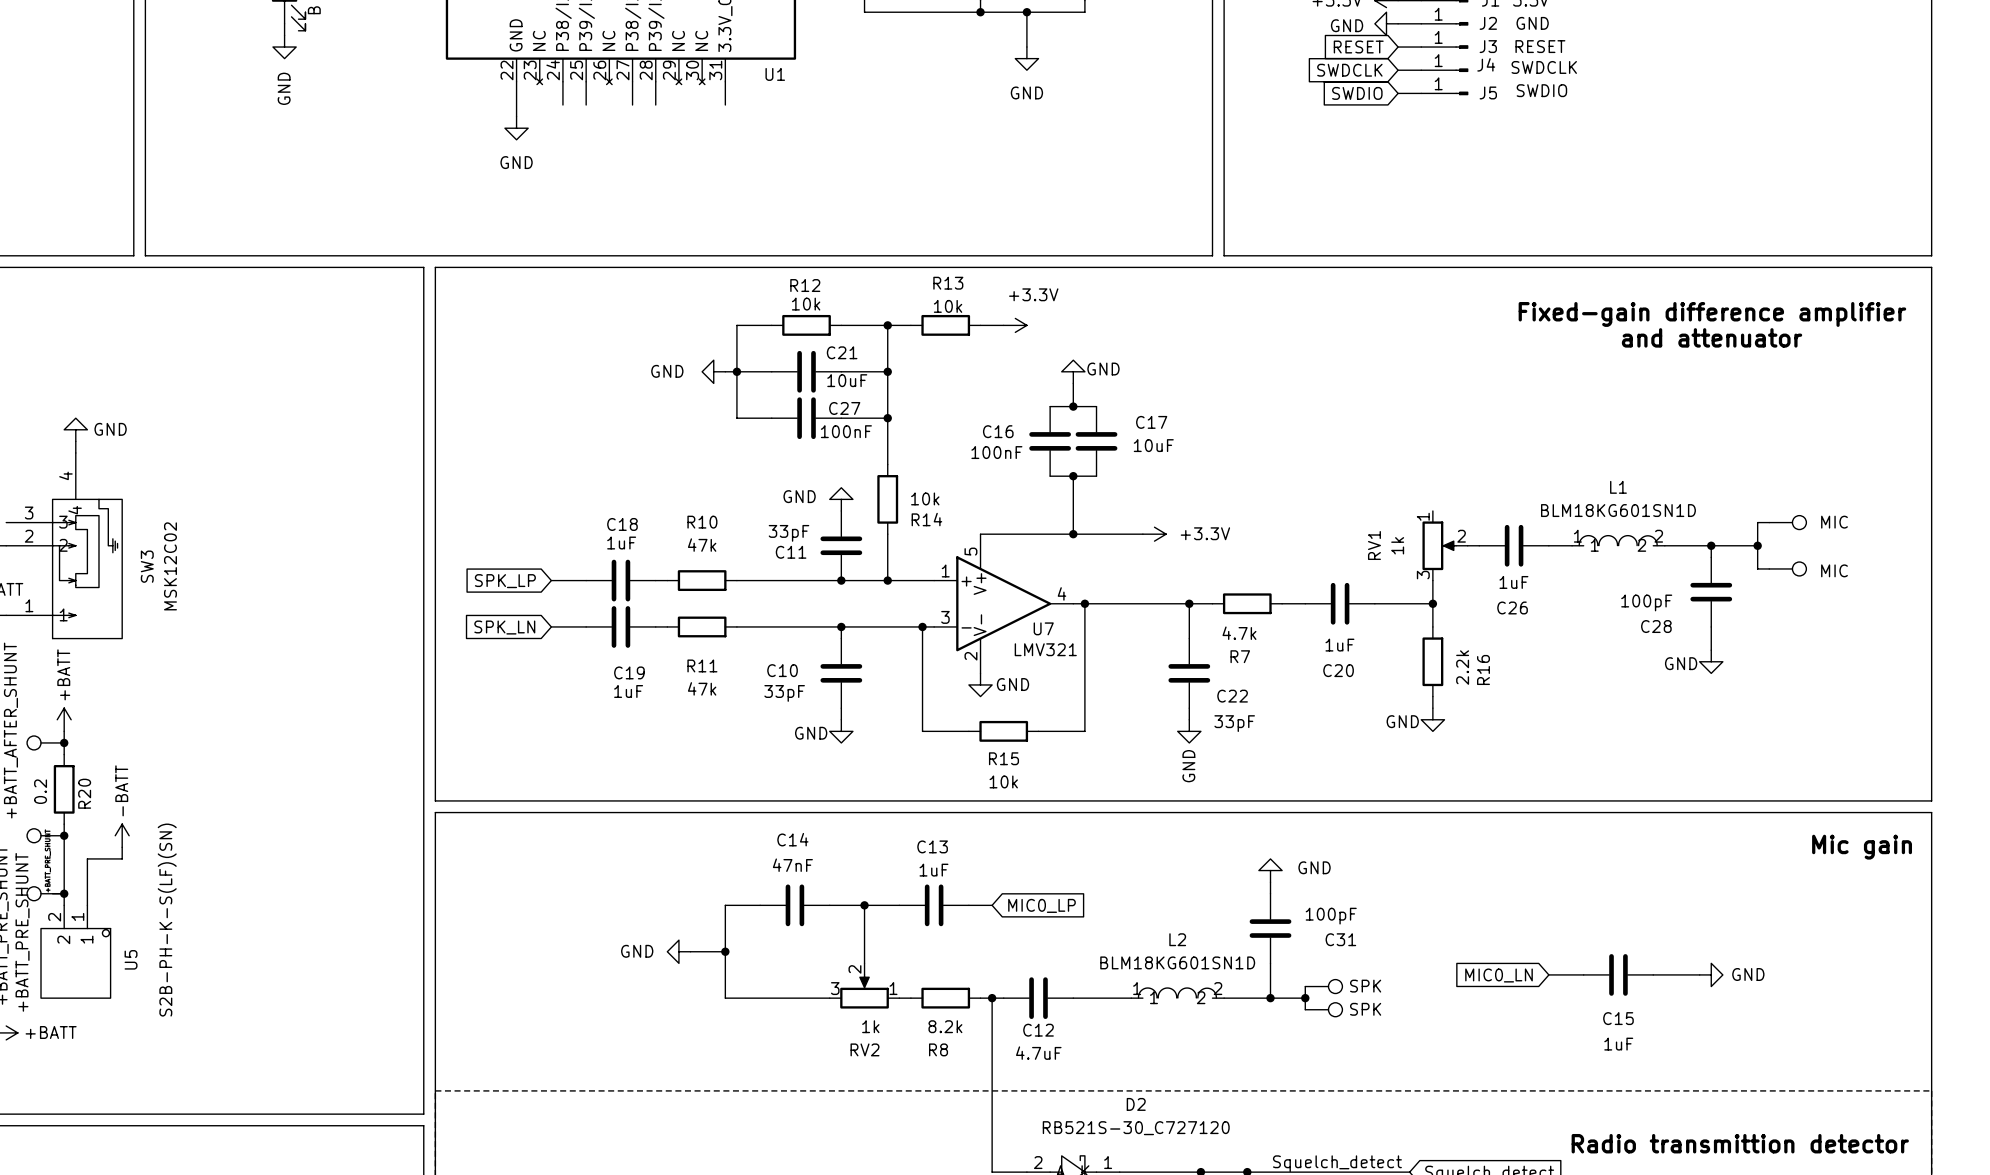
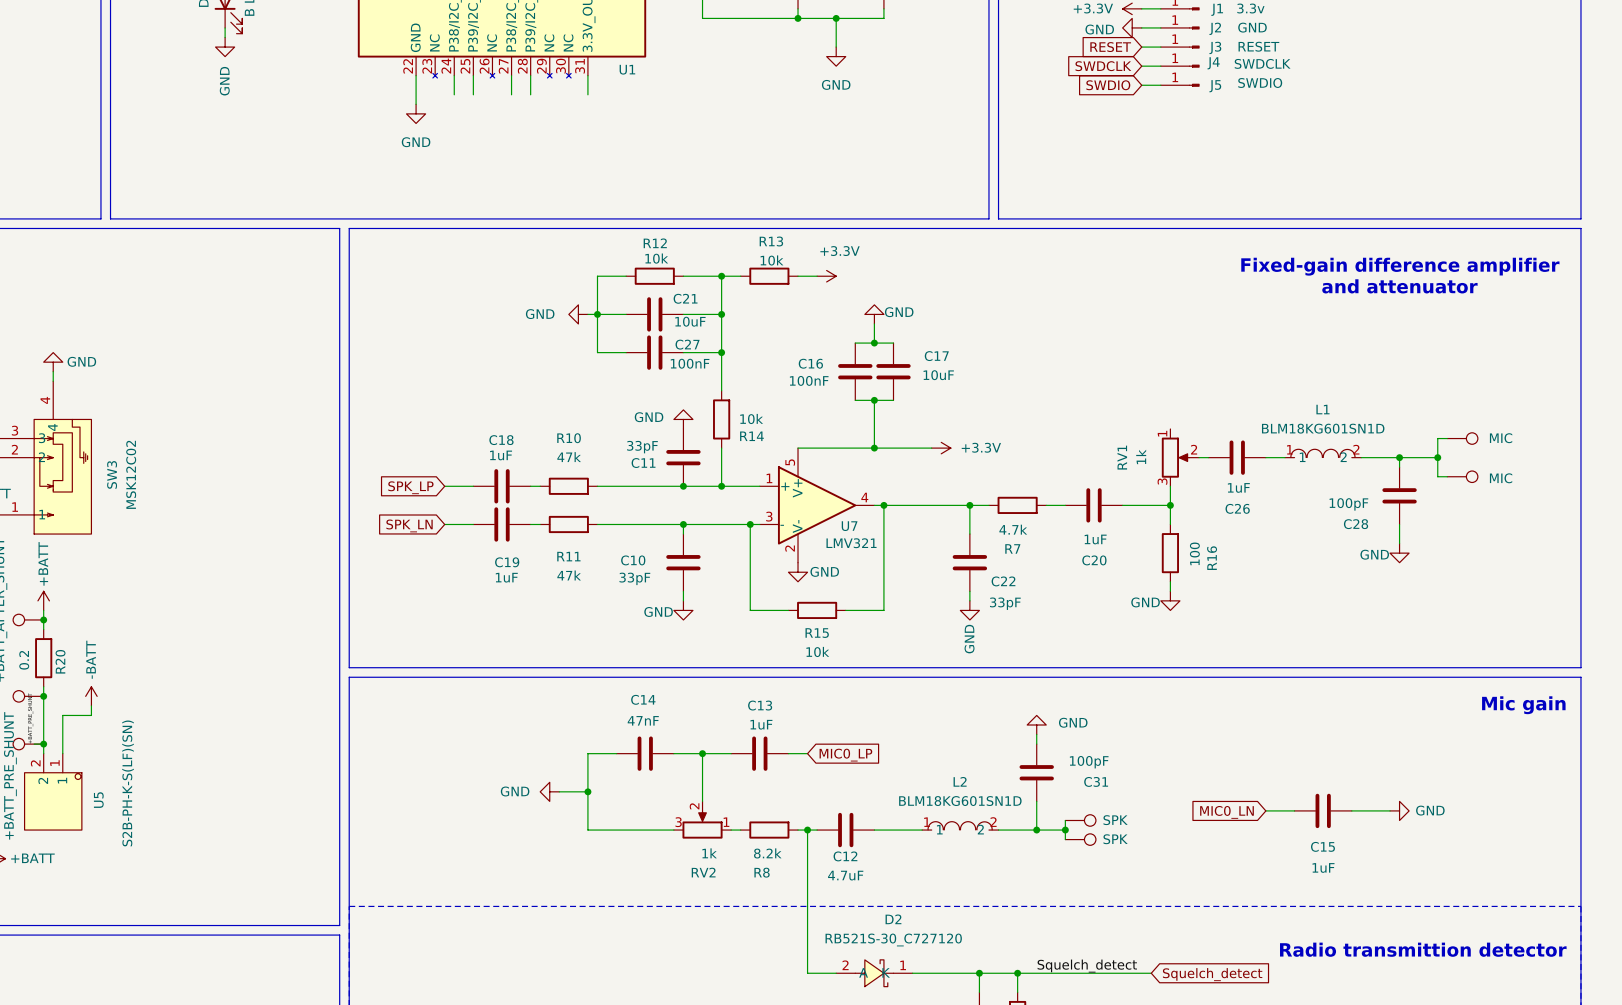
R16 value: 2.2k (1462, 667) -> 100 (1194, 553)
D2 name position: D2 (1136, 1104) -> D2 (893, 919)
D2 value position: RB521S-30_C727120 (1136, 1128) -> RB521S-30_C727120 (893, 939)

